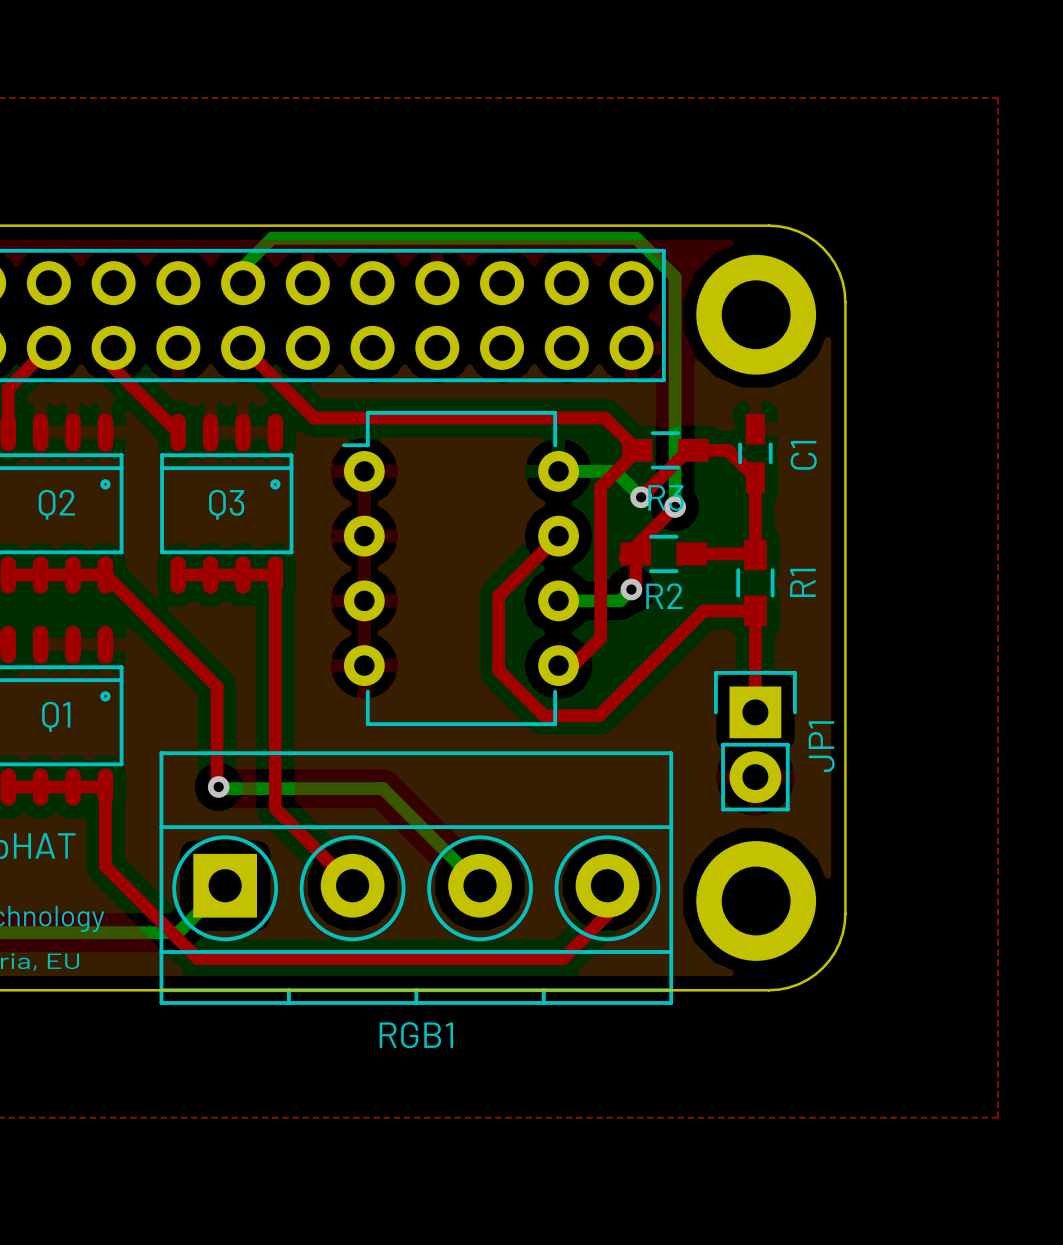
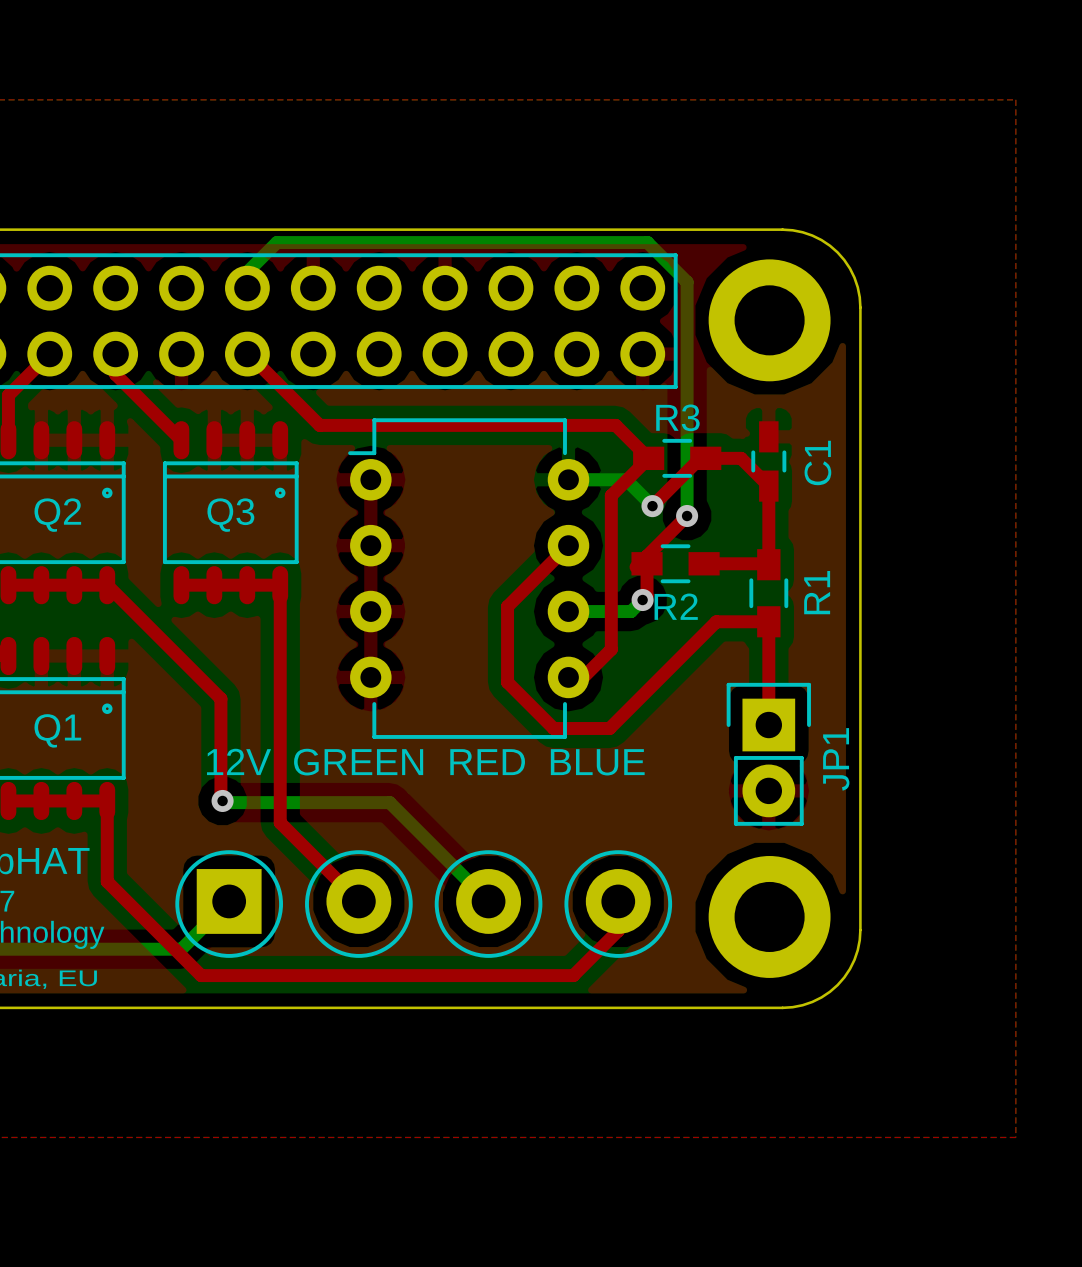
R3 name position: R3 (665, 497) -> R3 (677, 417)
text: none -> 12V GREEN RED BLUE (425, 762)
RGB1: (416, 878) -> none

